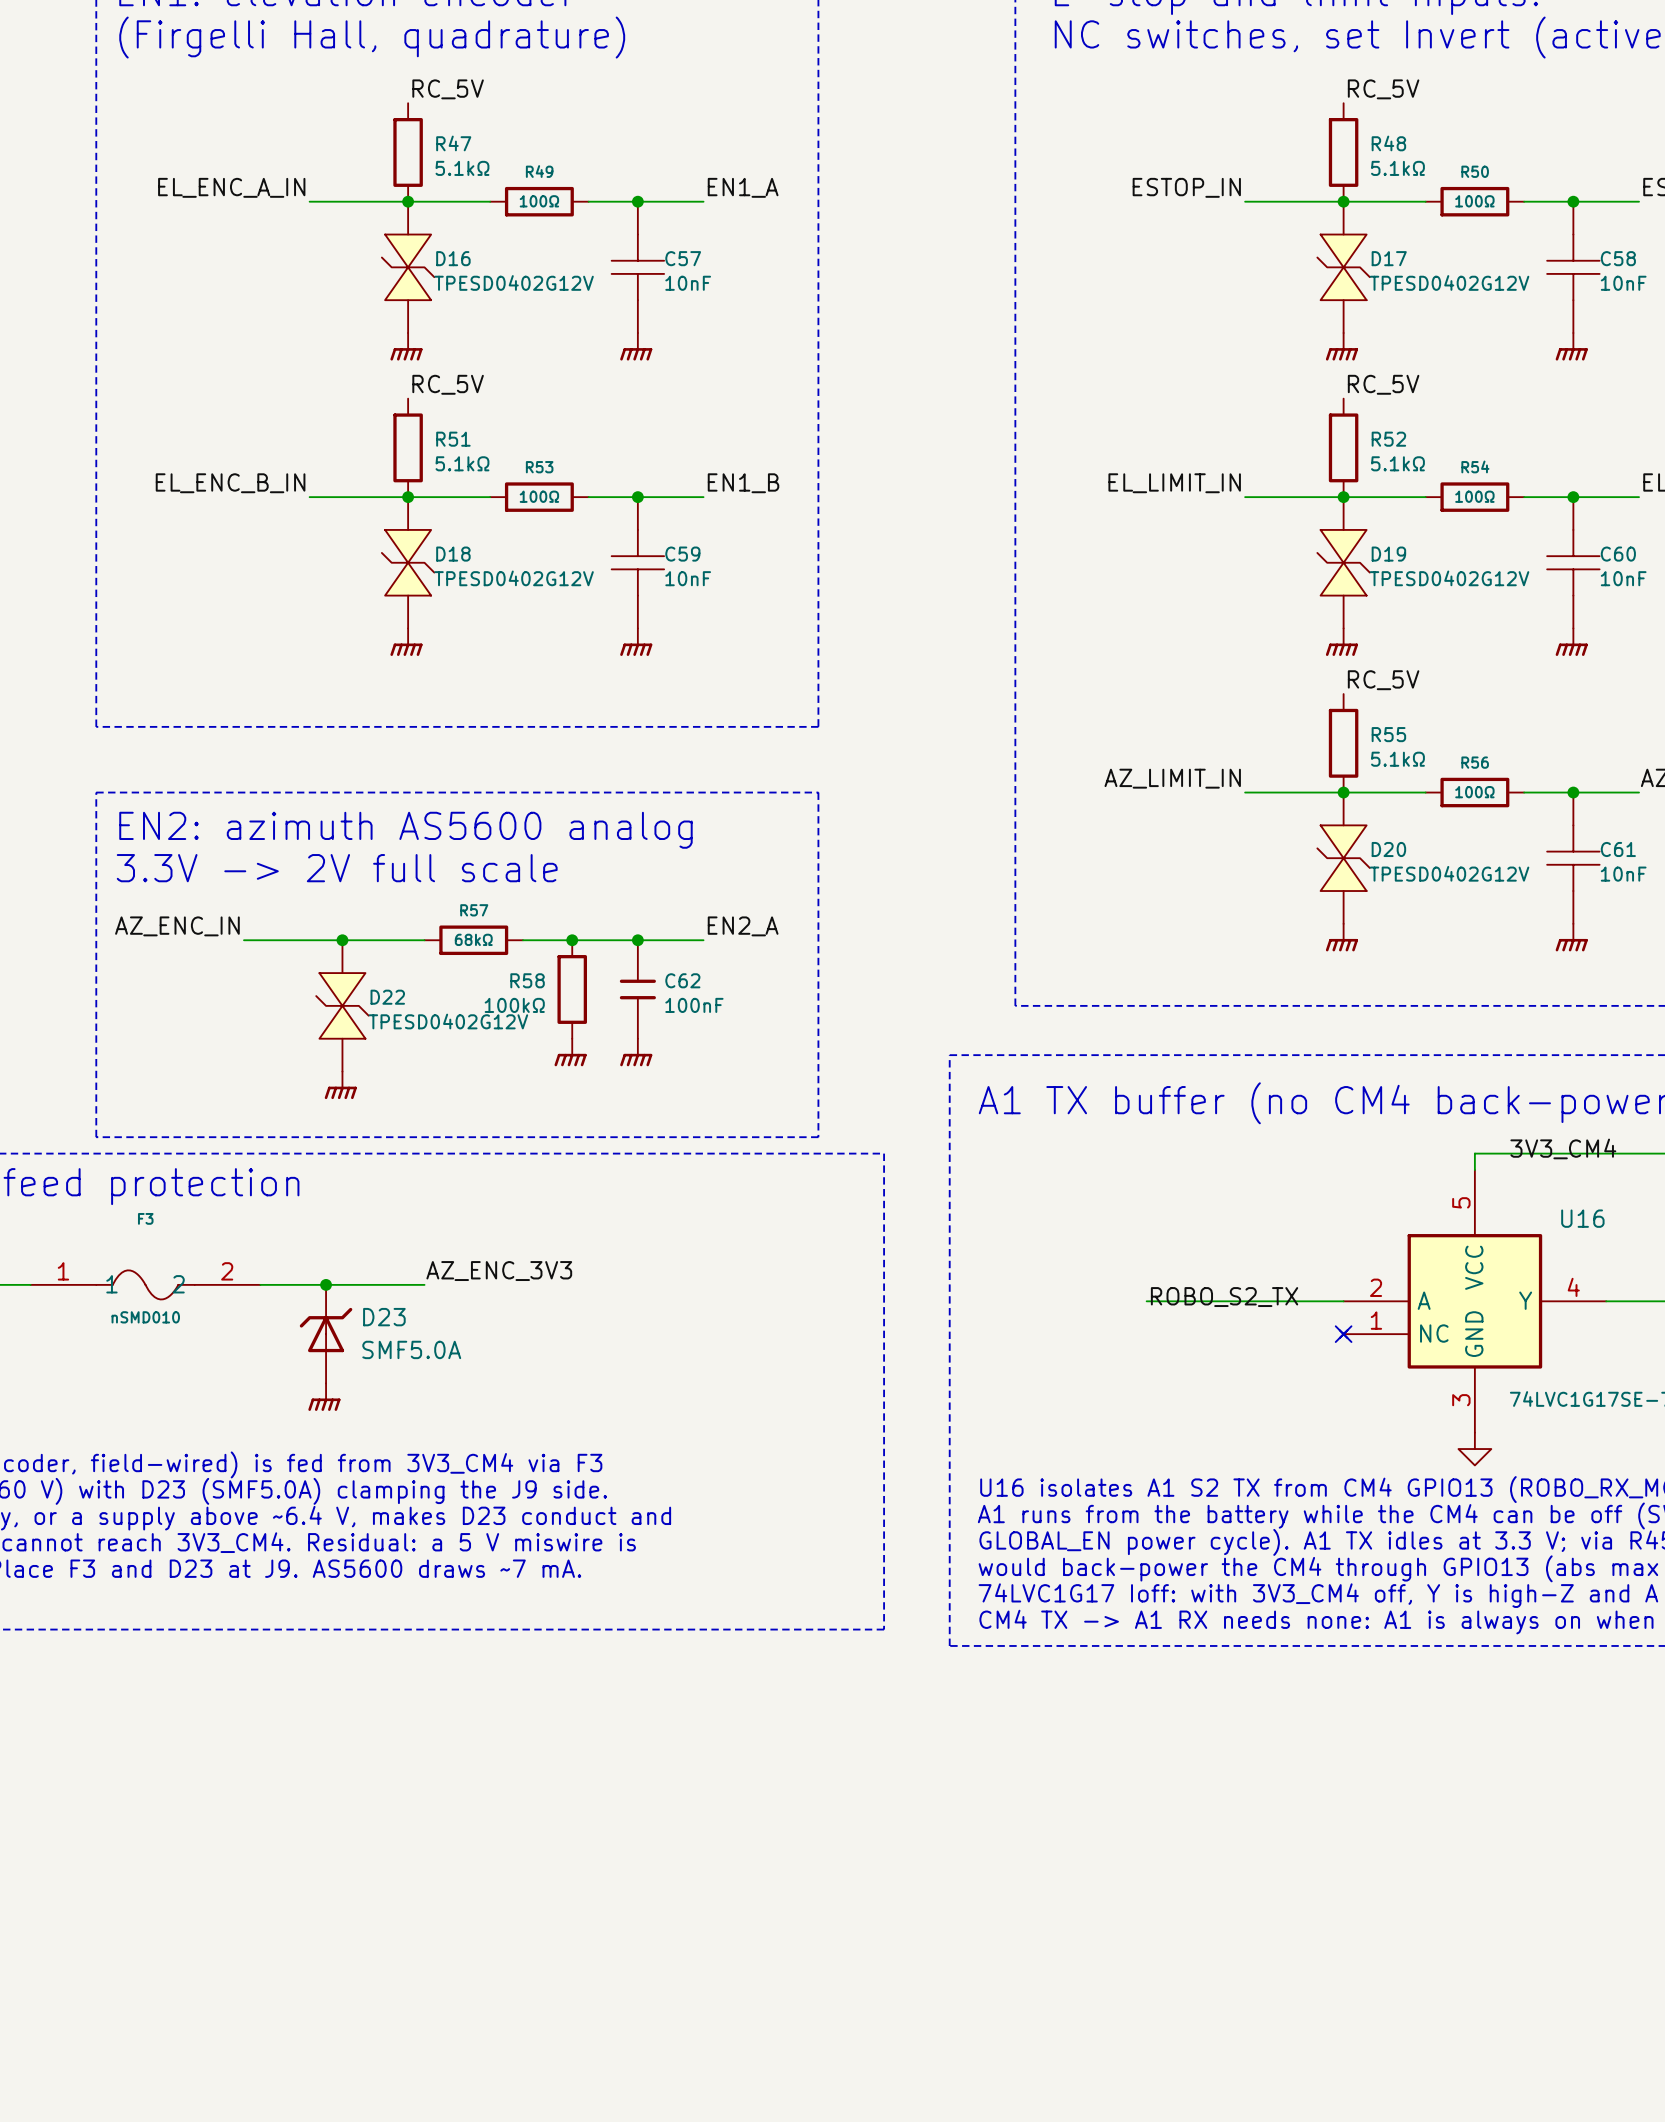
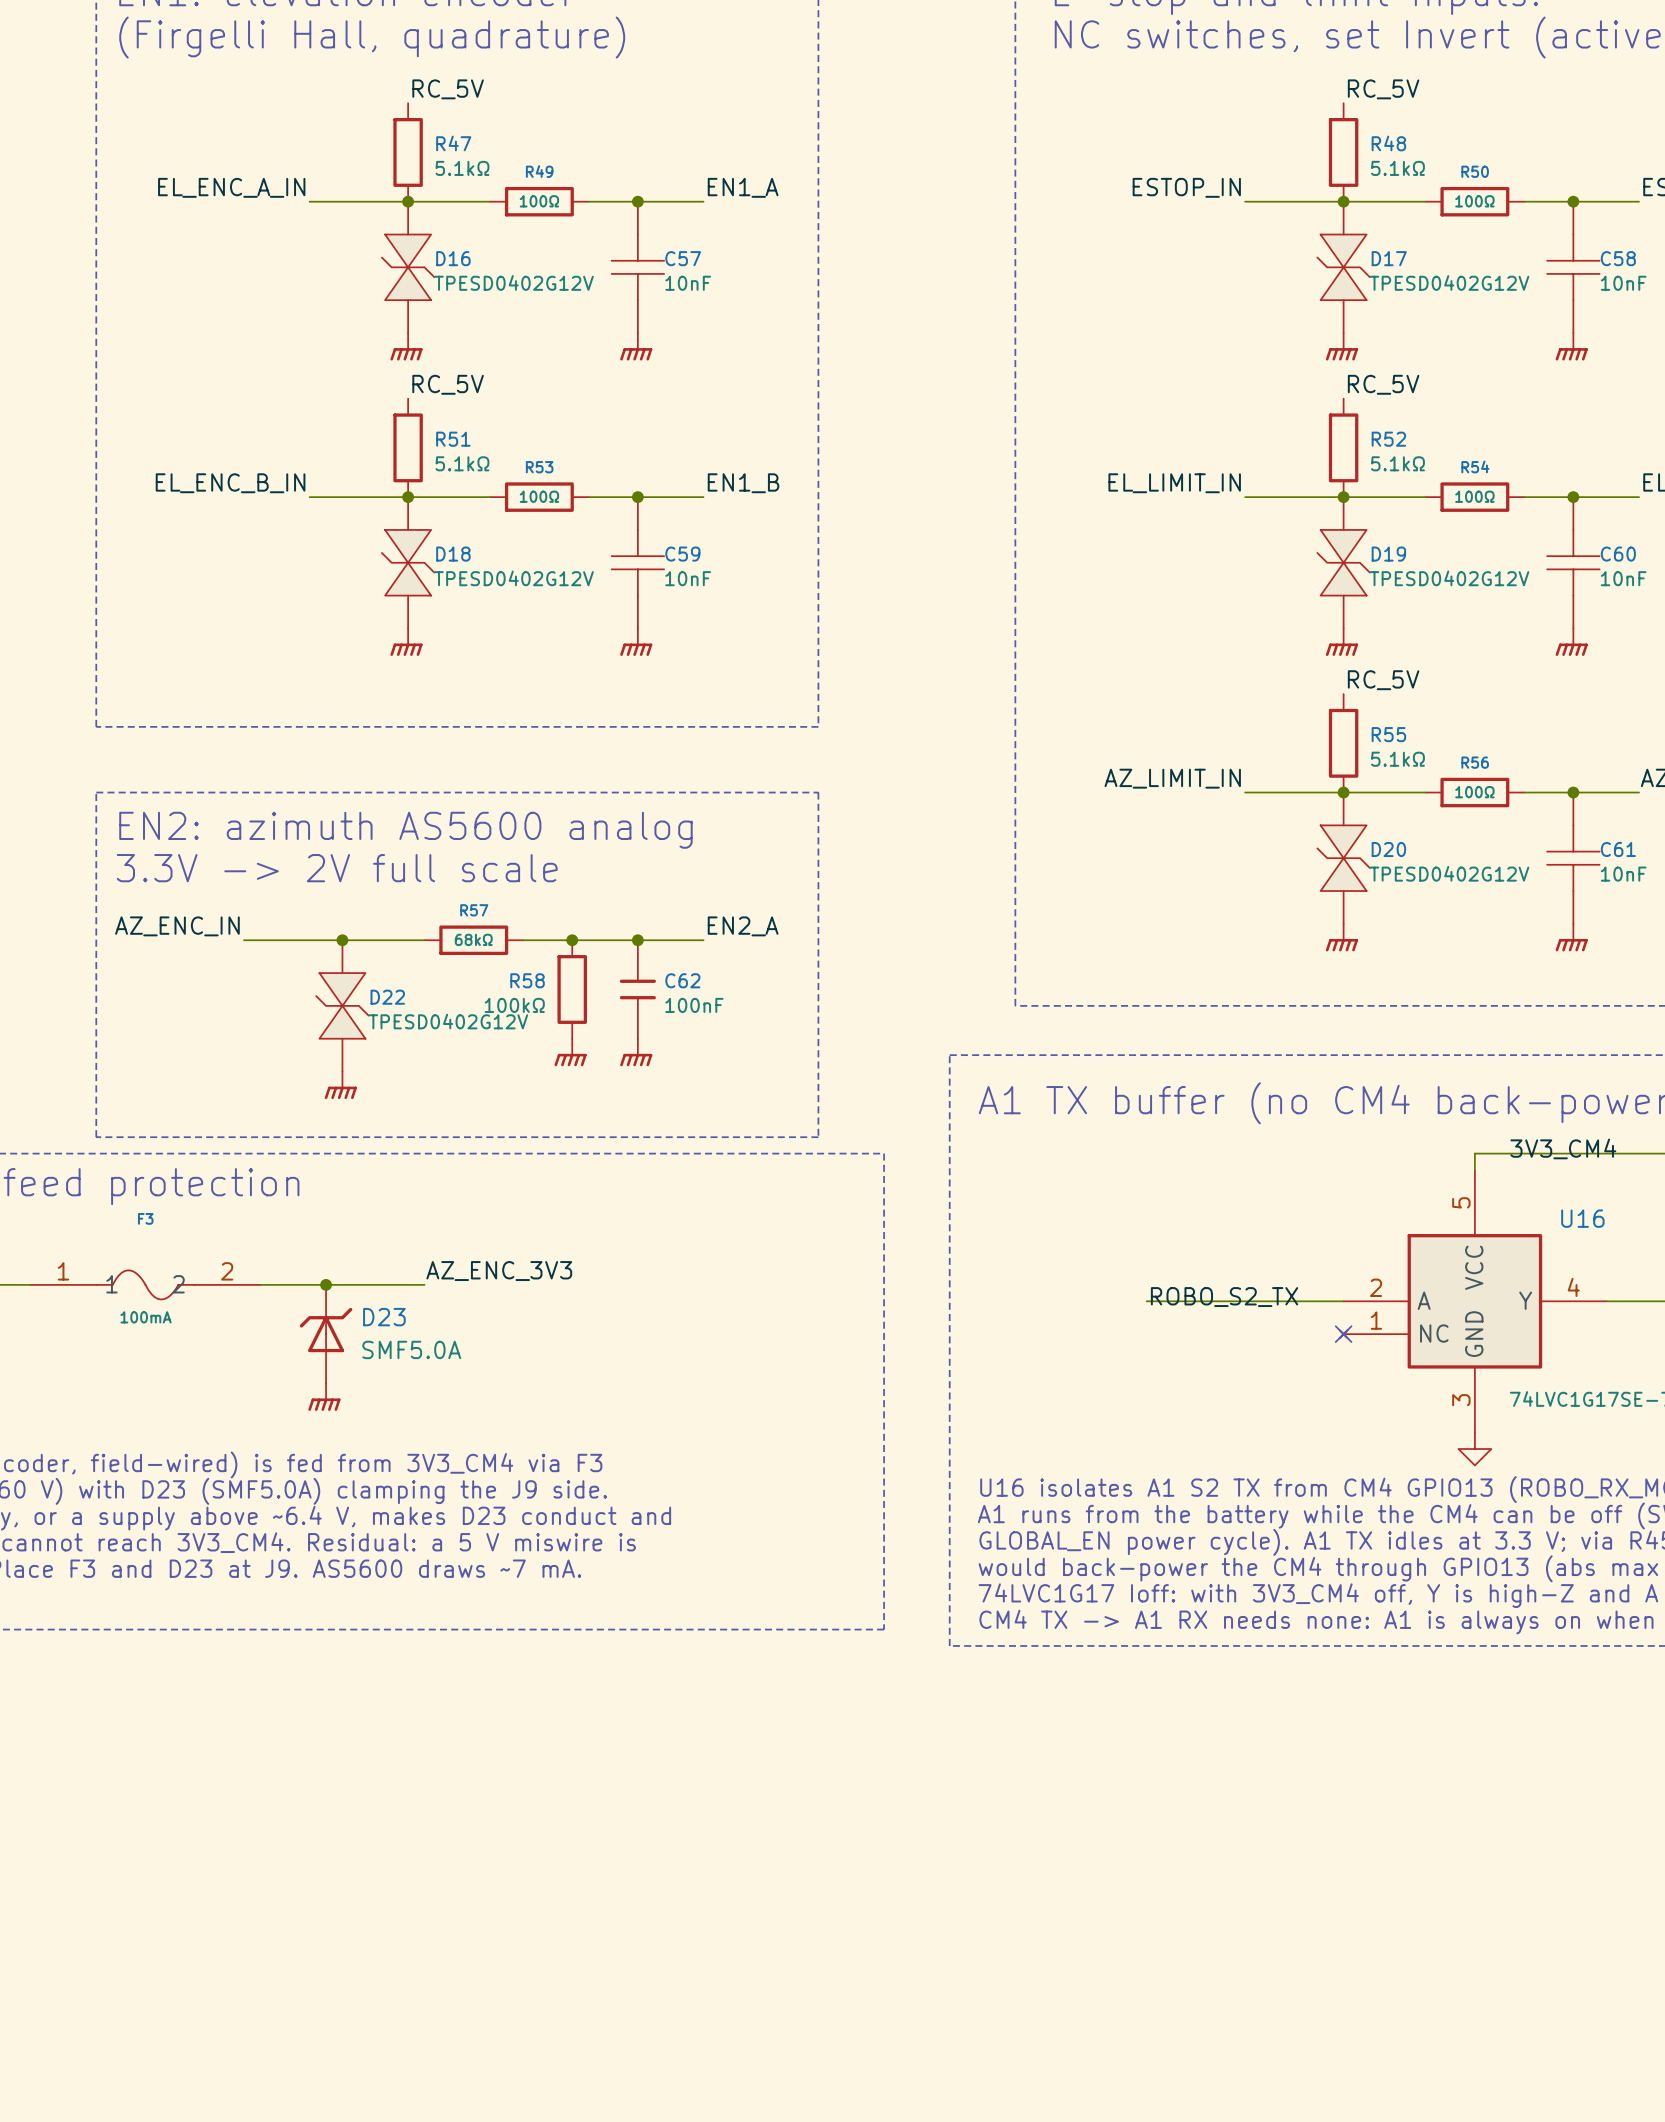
F3 value: nSMD010 (145, 1317) -> 100mA (146, 1317)

